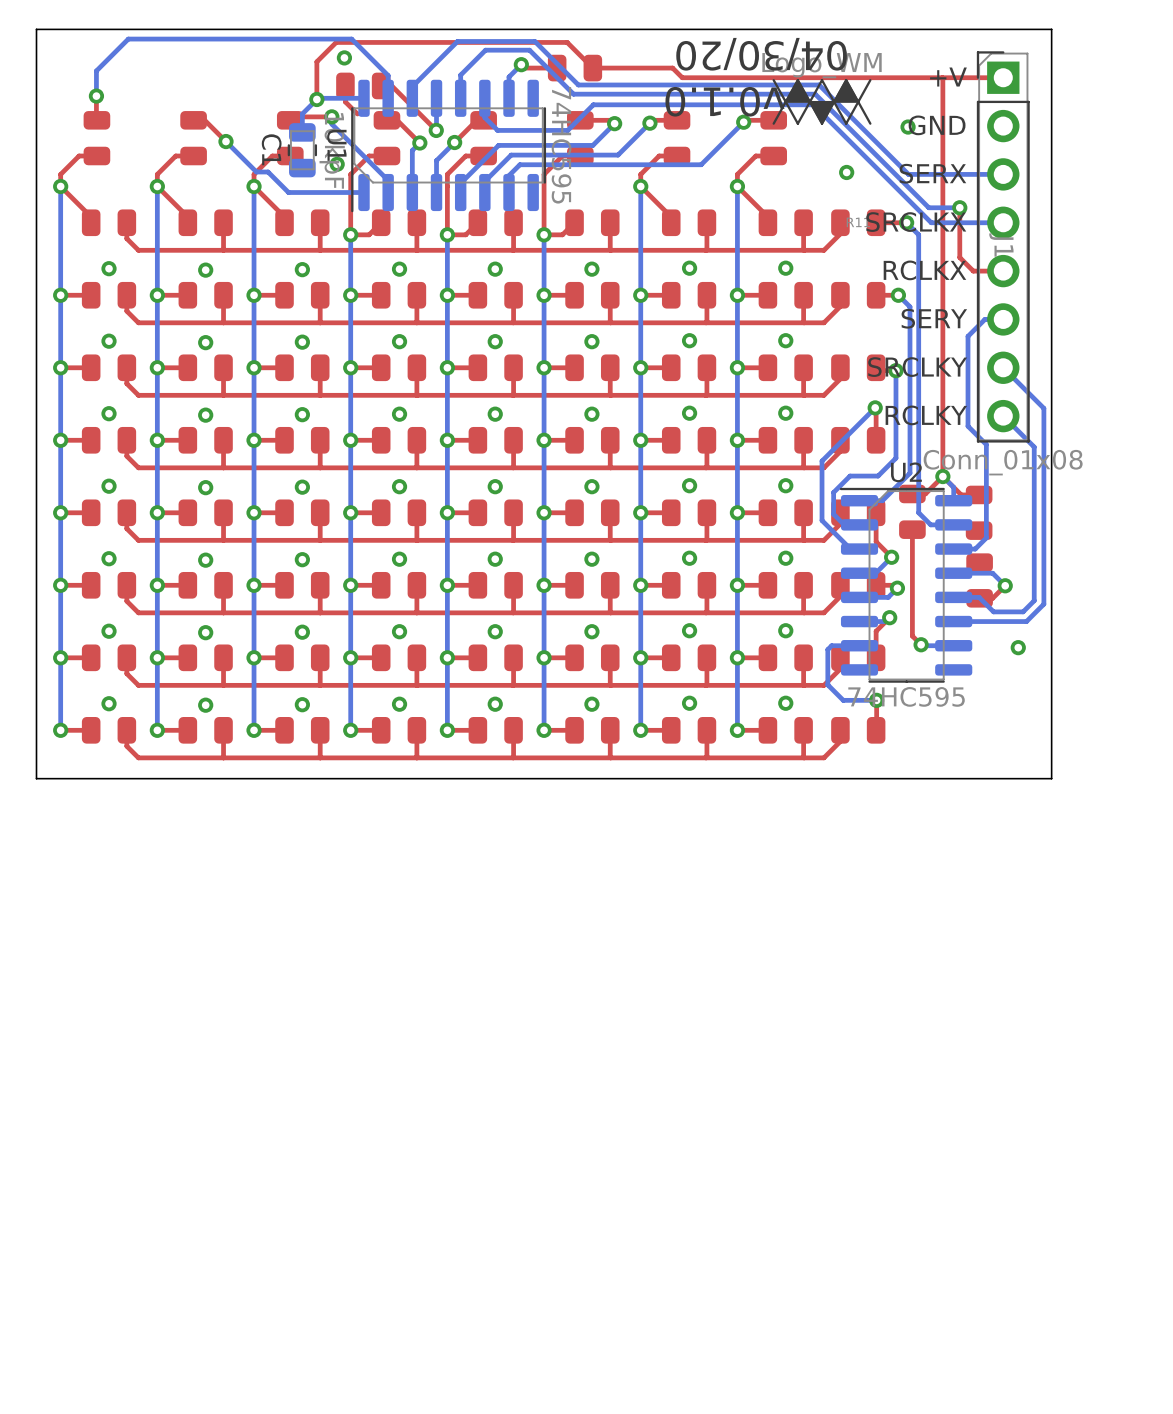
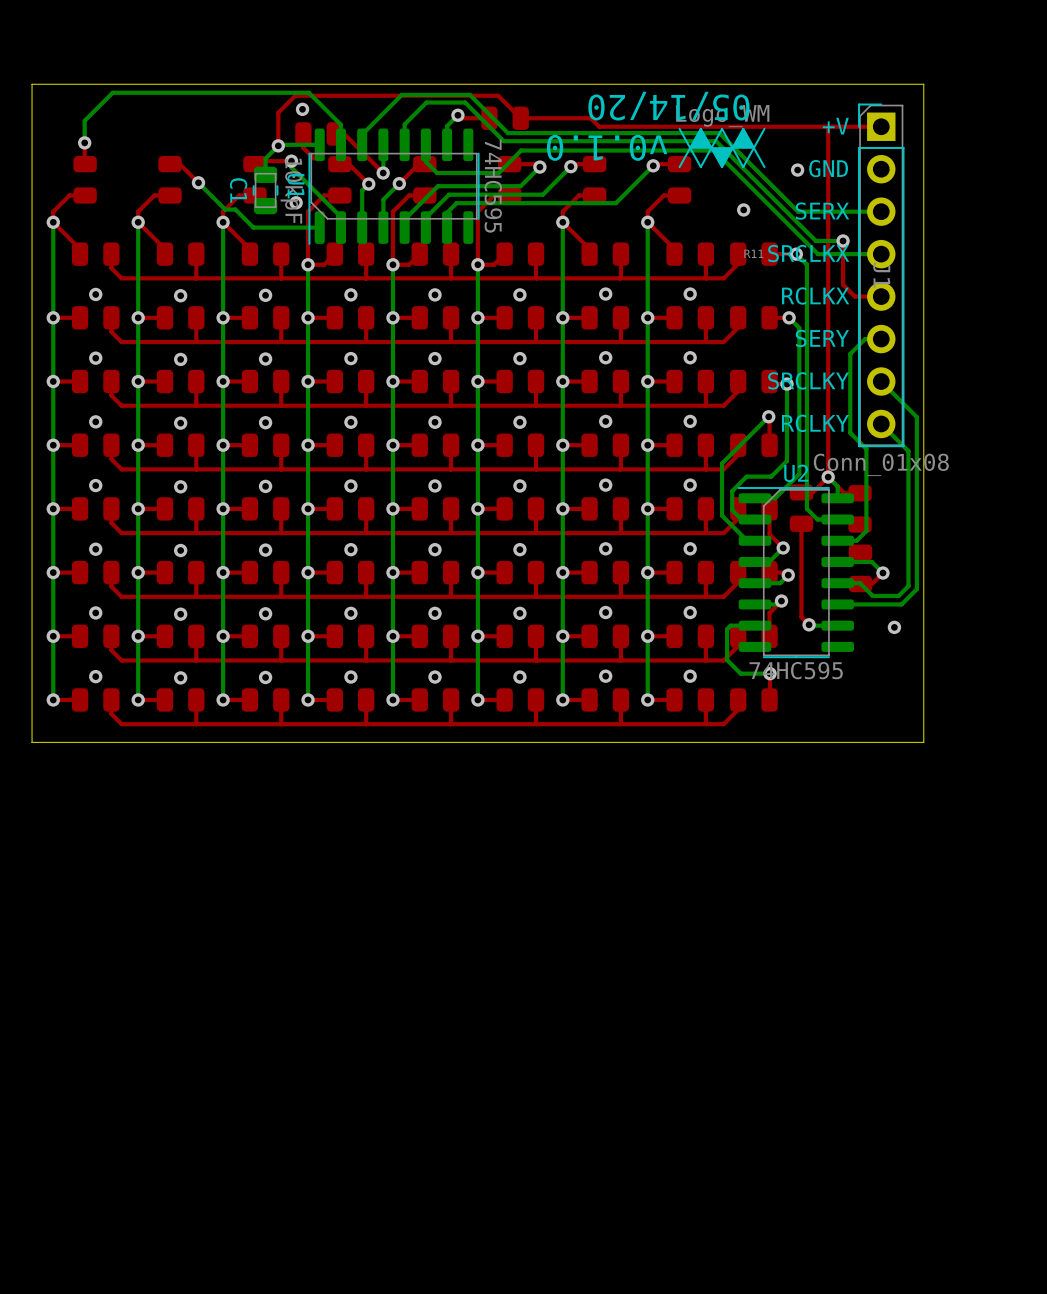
text: 04/30/20 (761, 54) -> 05/14/20 (668, 106)

